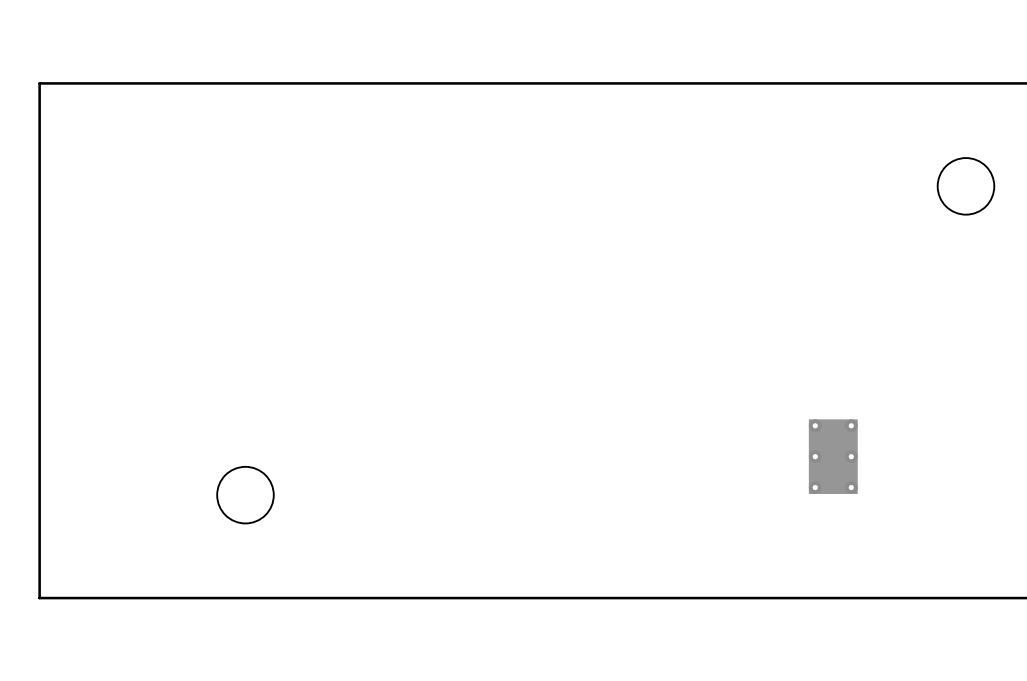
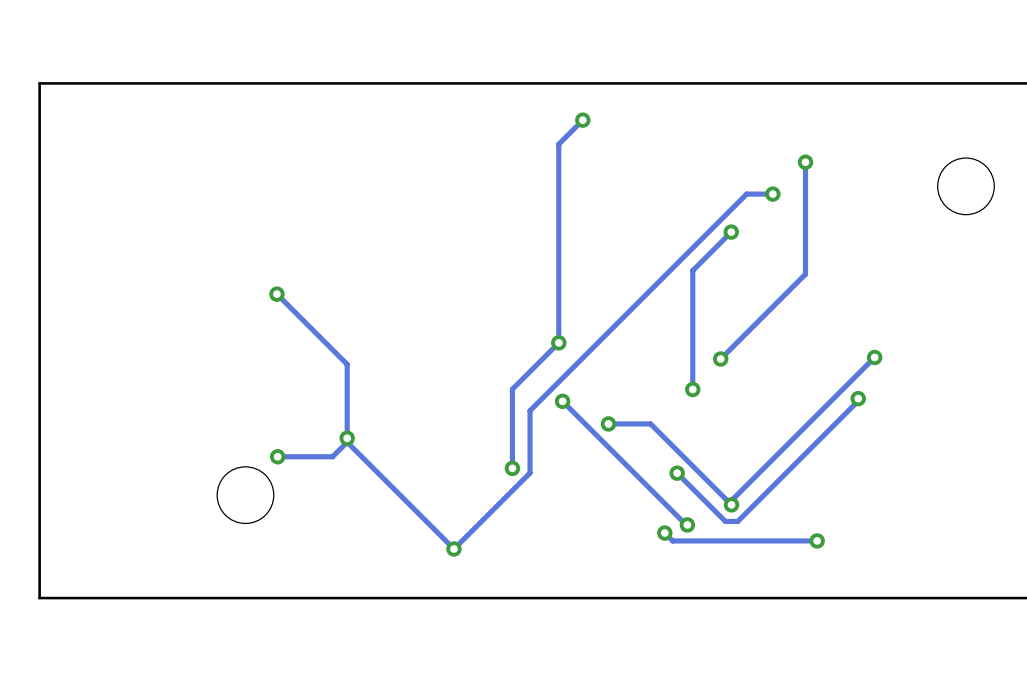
track: none -> (582, 120) (558, 144) (558, 342) (512, 389) (512, 468)
via: none -> (582, 120)
track: none -> (805, 162) (805, 274) (720, 359)
via: none -> (805, 162)
track: none -> (772, 194) (746, 194) (530, 410) (530, 472) (454, 548) (347, 442)
via: none -> (772, 194)
track: none -> (731, 232) (692, 270) (692, 389)
via: none -> (731, 232)
track: none -> (276, 294) (347, 364) (347, 442)
via: none -> (276, 294)
via: none -> (558, 342)
track: none -> (874, 357) (731, 500) (731, 504) (650, 423) (608, 423)
via: none -> (874, 357)
via: none -> (720, 359)
via: none -> (692, 389)
track: none -> (858, 398) (858, 400) (737, 521) (725, 521) (677, 473)
via: none -> (858, 398)
track: none -> (562, 401) (687, 524)
via: none -> (562, 401)
via: none -> (608, 423)
via: none -> (347, 438)
track: none -> (347, 442) (332, 456) (277, 456)
via: none -> (277, 456)
part: (833, 456) -> none
via: none -> (512, 468)
via: none -> (677, 473)
via: none -> (731, 504)
via: none -> (687, 524)
track: none -> (664, 533) (672, 540) (817, 540)
via: none -> (664, 533)
via: none -> (817, 540)
via: none -> (454, 548)

